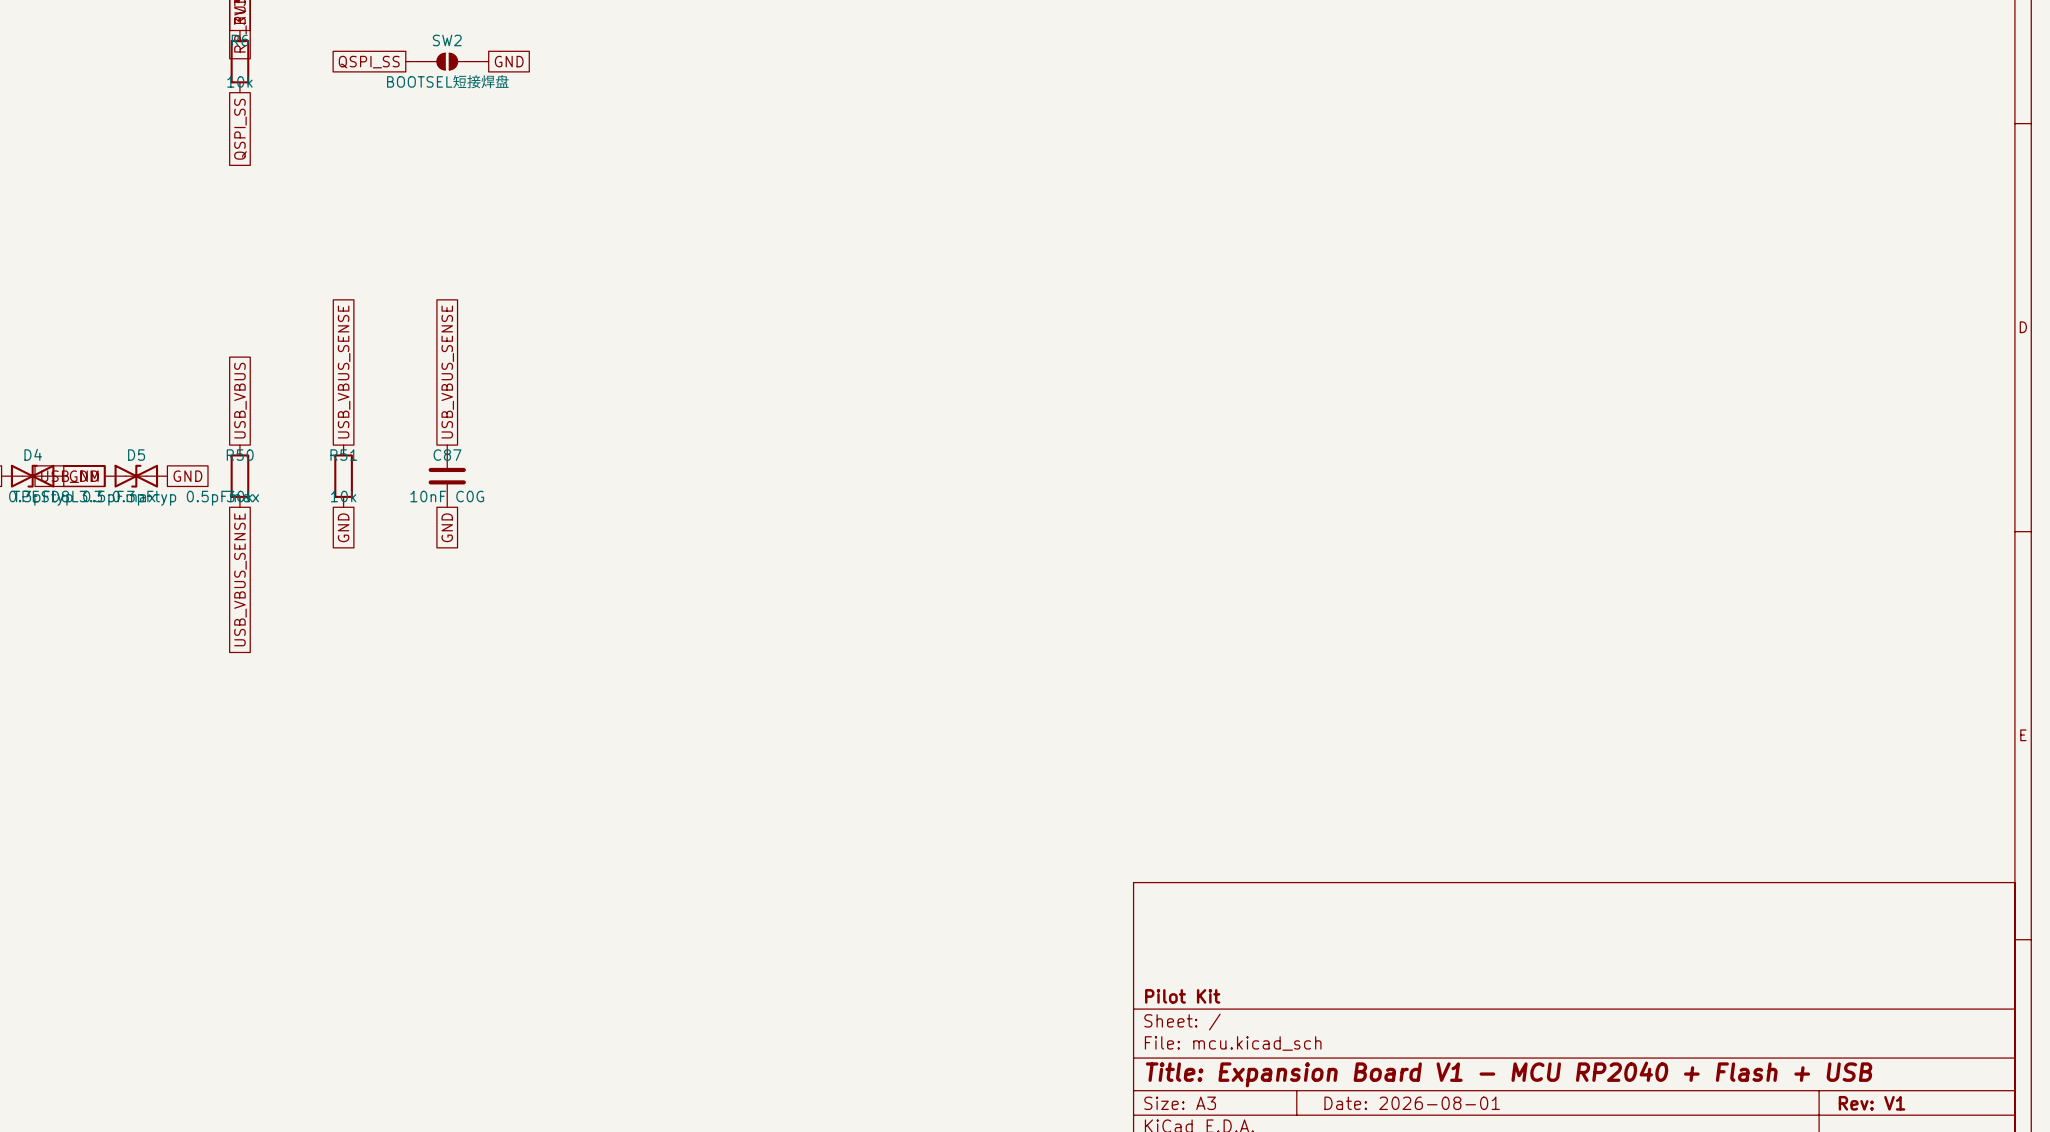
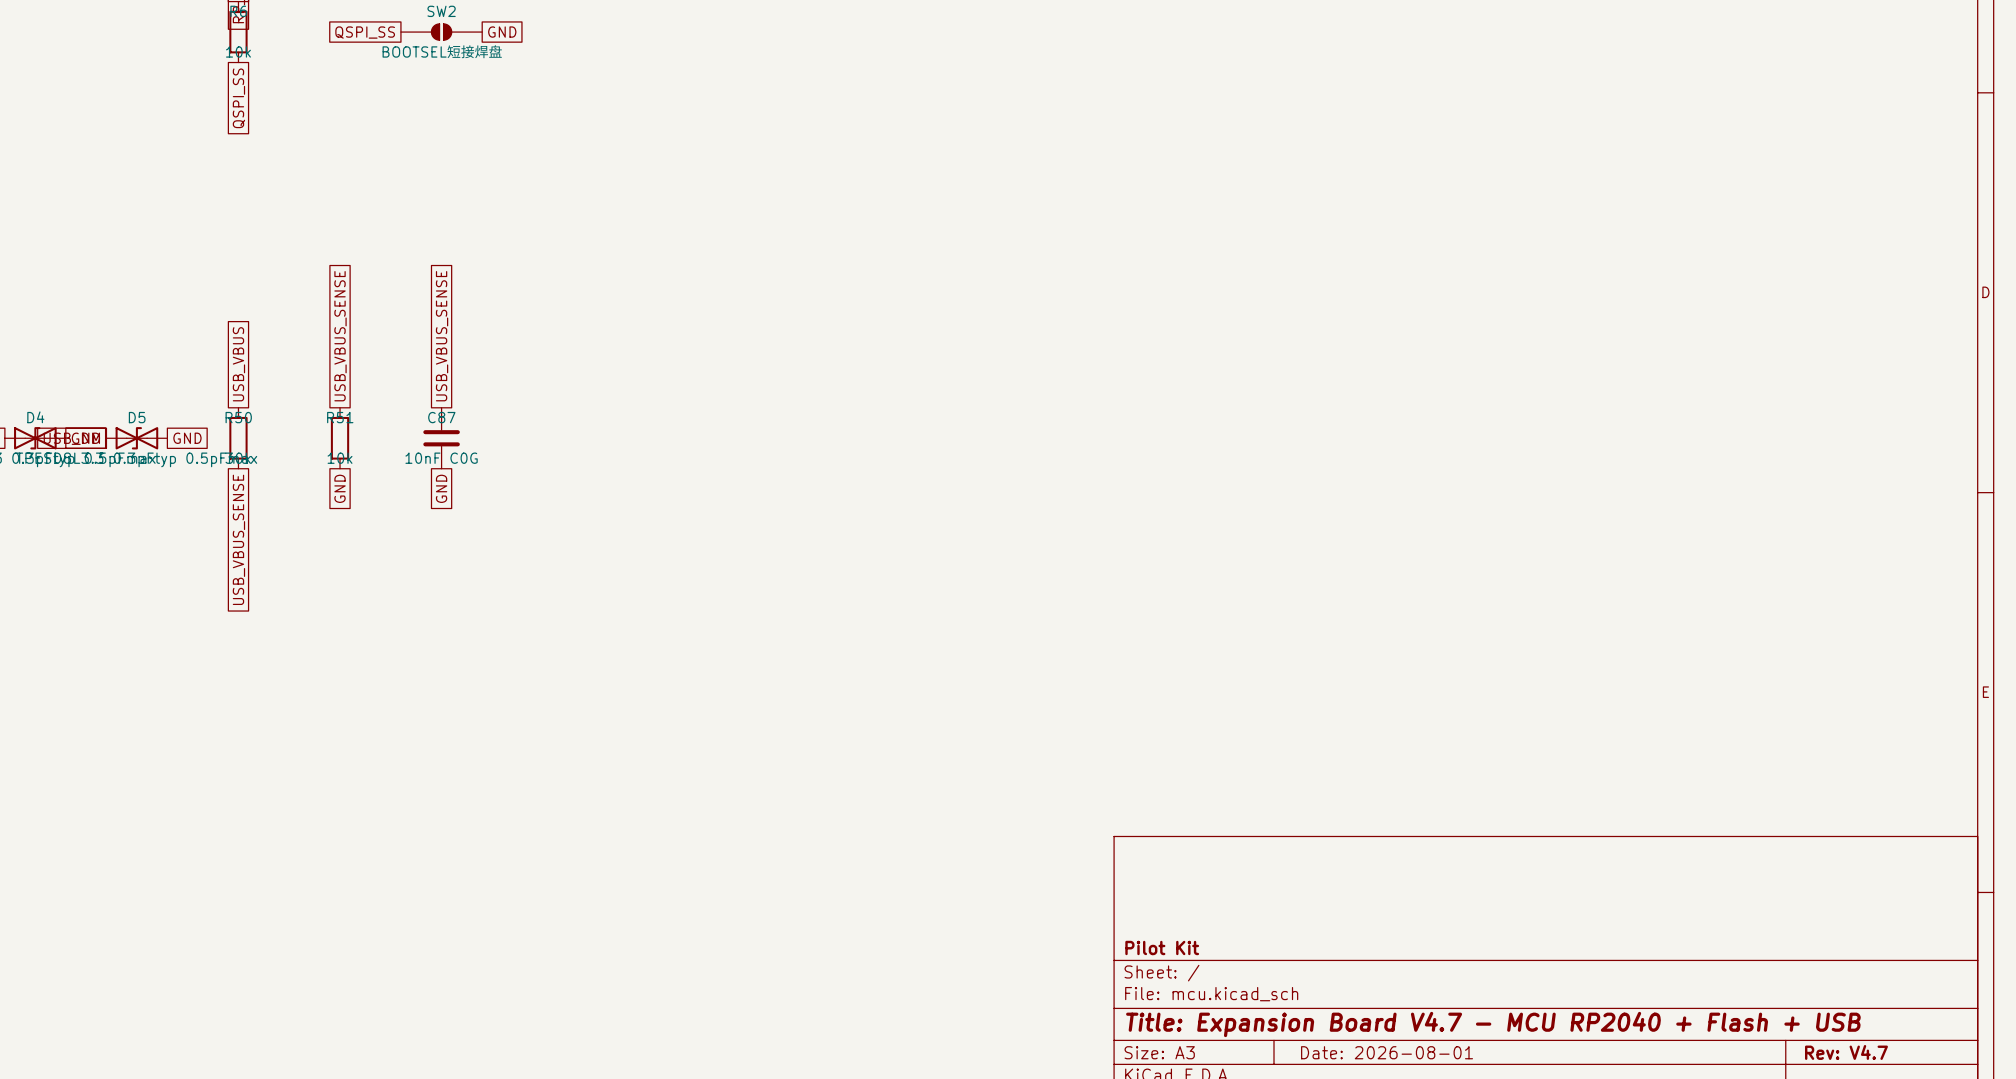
title block: Title: Expansion Board V1 - MCU RP2040 + Flash + USB (1509, 1074) -> Title: Expansion Board V4.7 - MCU RP2040 + Flash + USB (1493, 1024)
title block: Rev: V1 (1871, 1103) -> Rev: V4.7 (1846, 1052)

